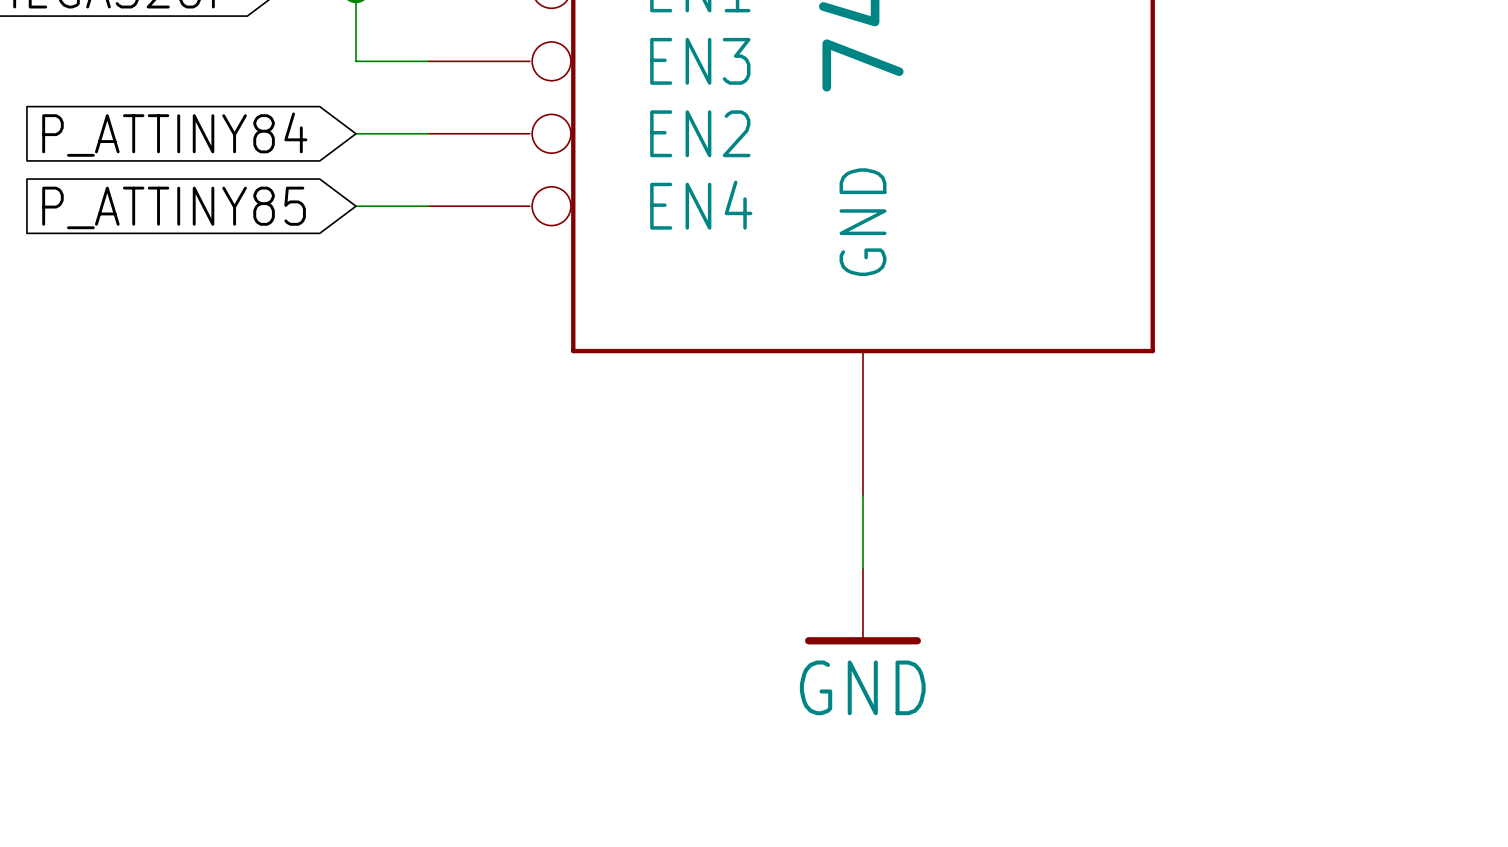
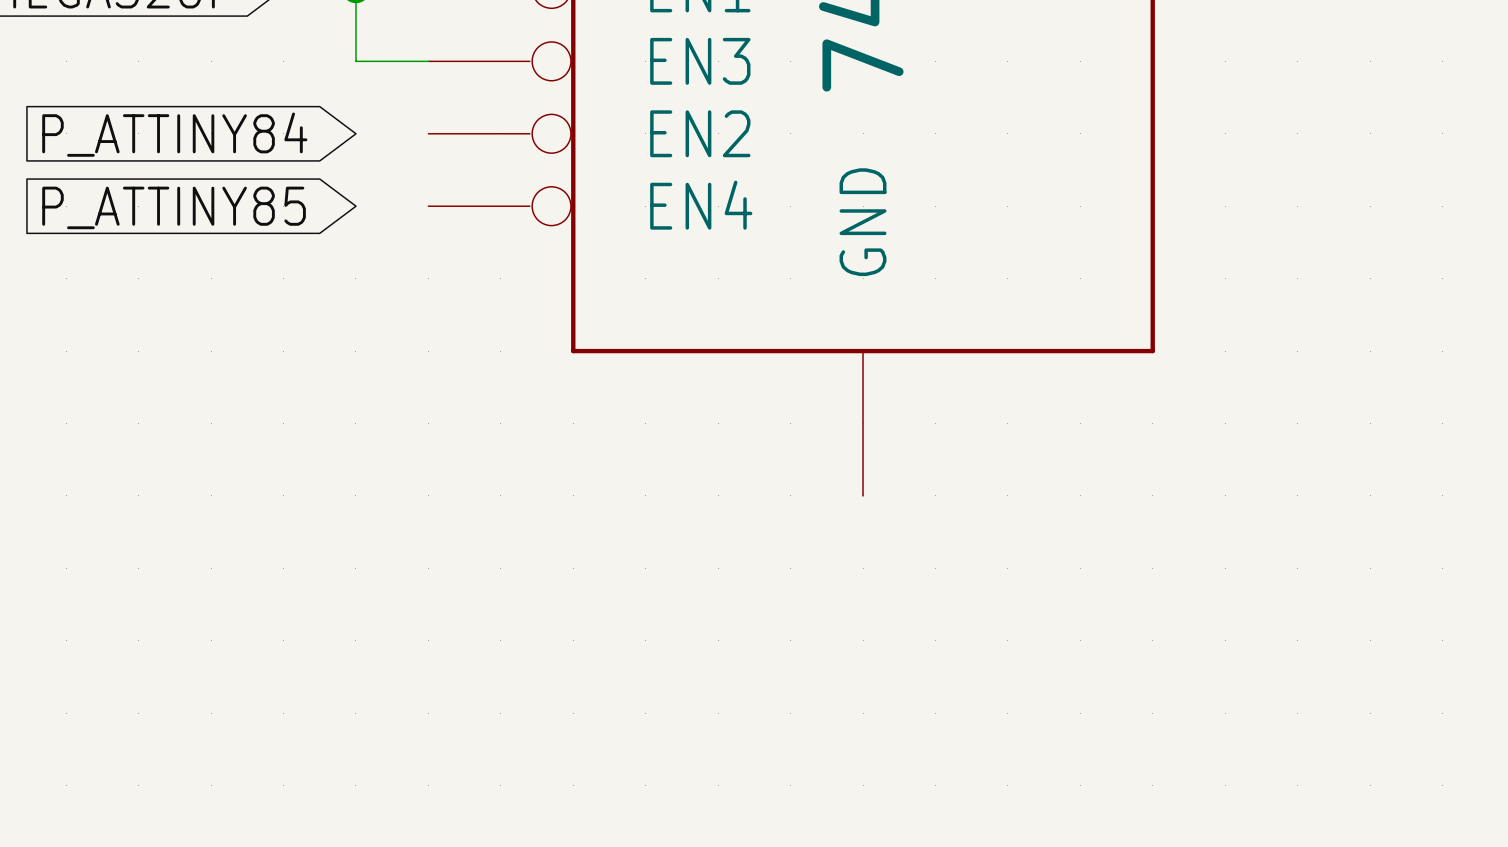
wire: (355, 133) (428, 133) -> none
wire: (355, 206) (428, 206) -> none
wire: (863, 495) (863, 568) -> none
power symbol: GND (863, 606) -> none

